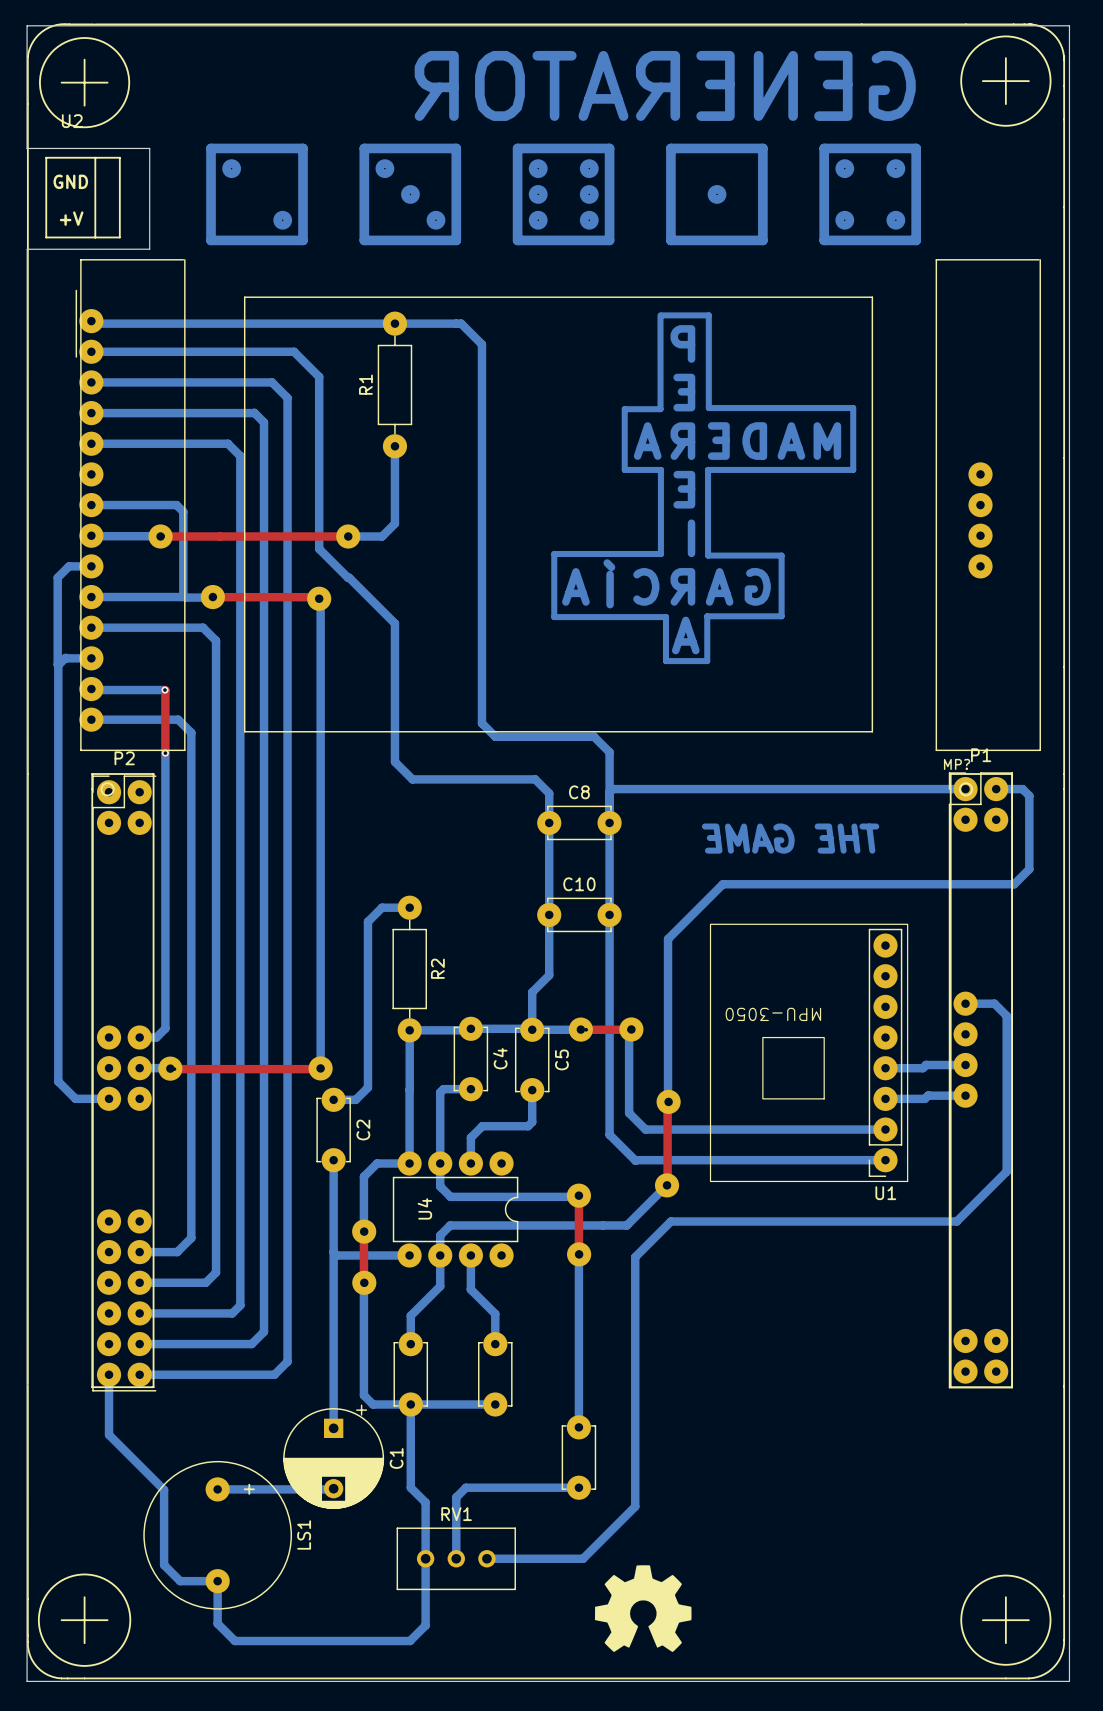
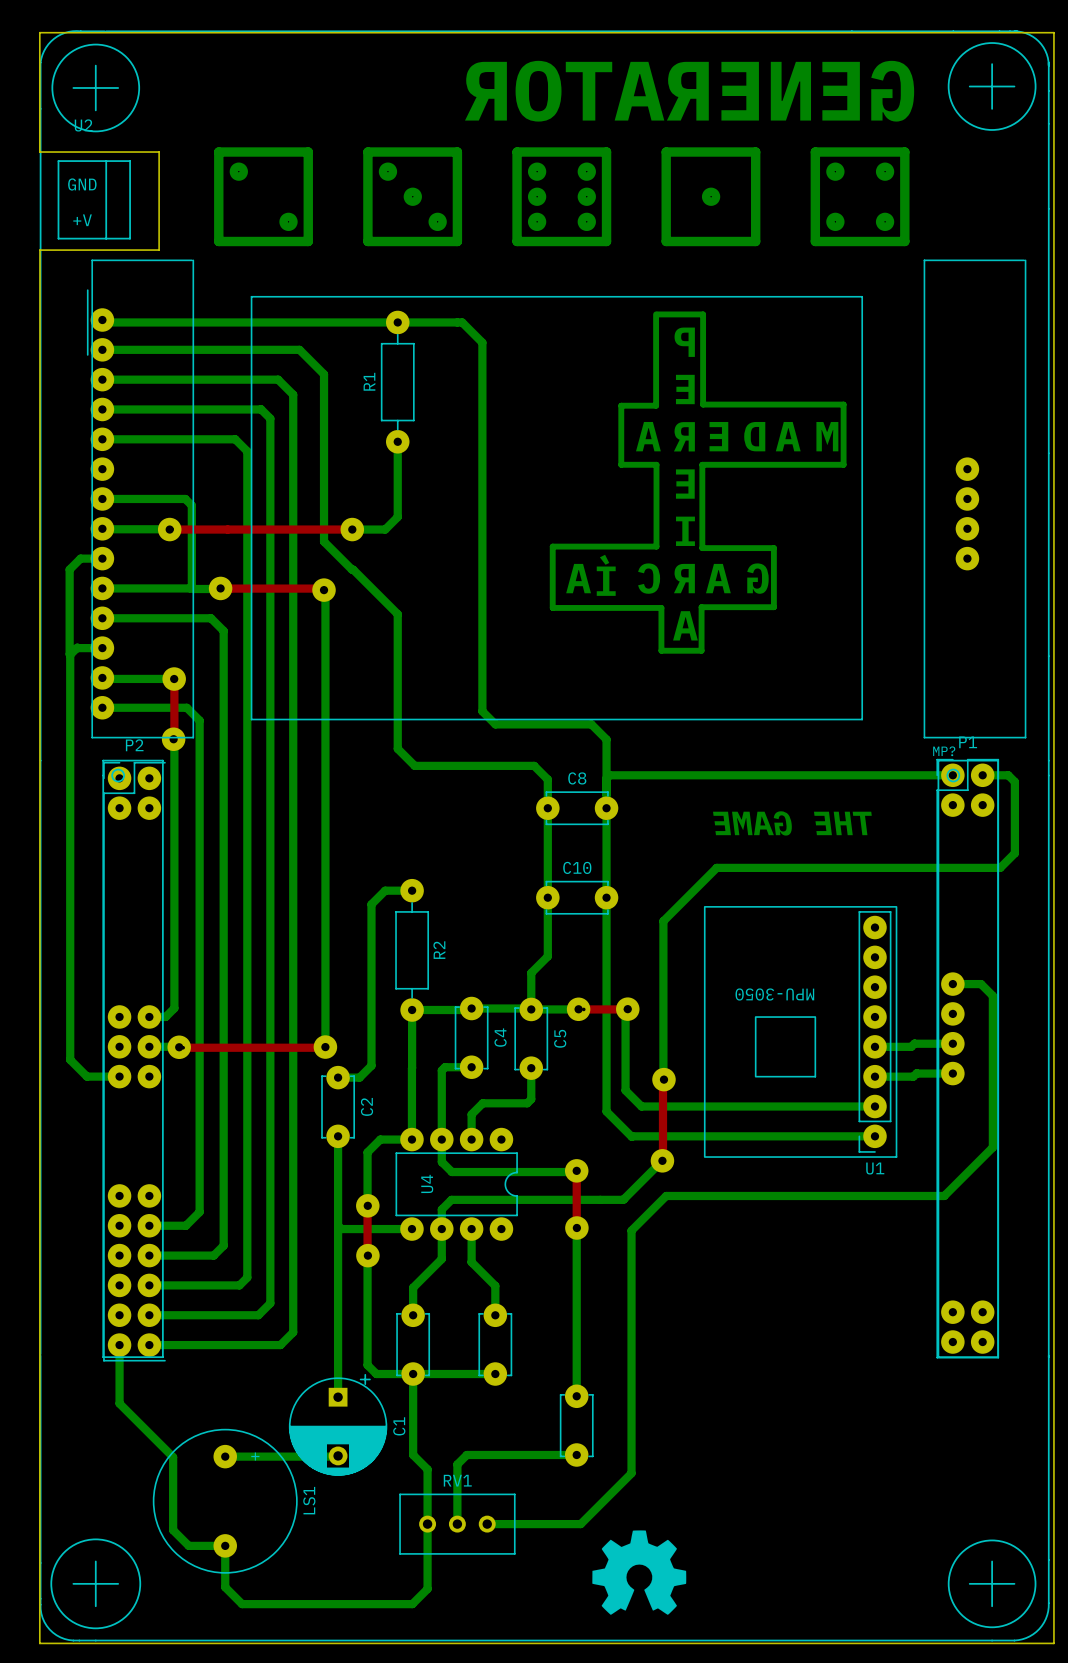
part: none -> (174, 679)
part: none -> (173, 739)

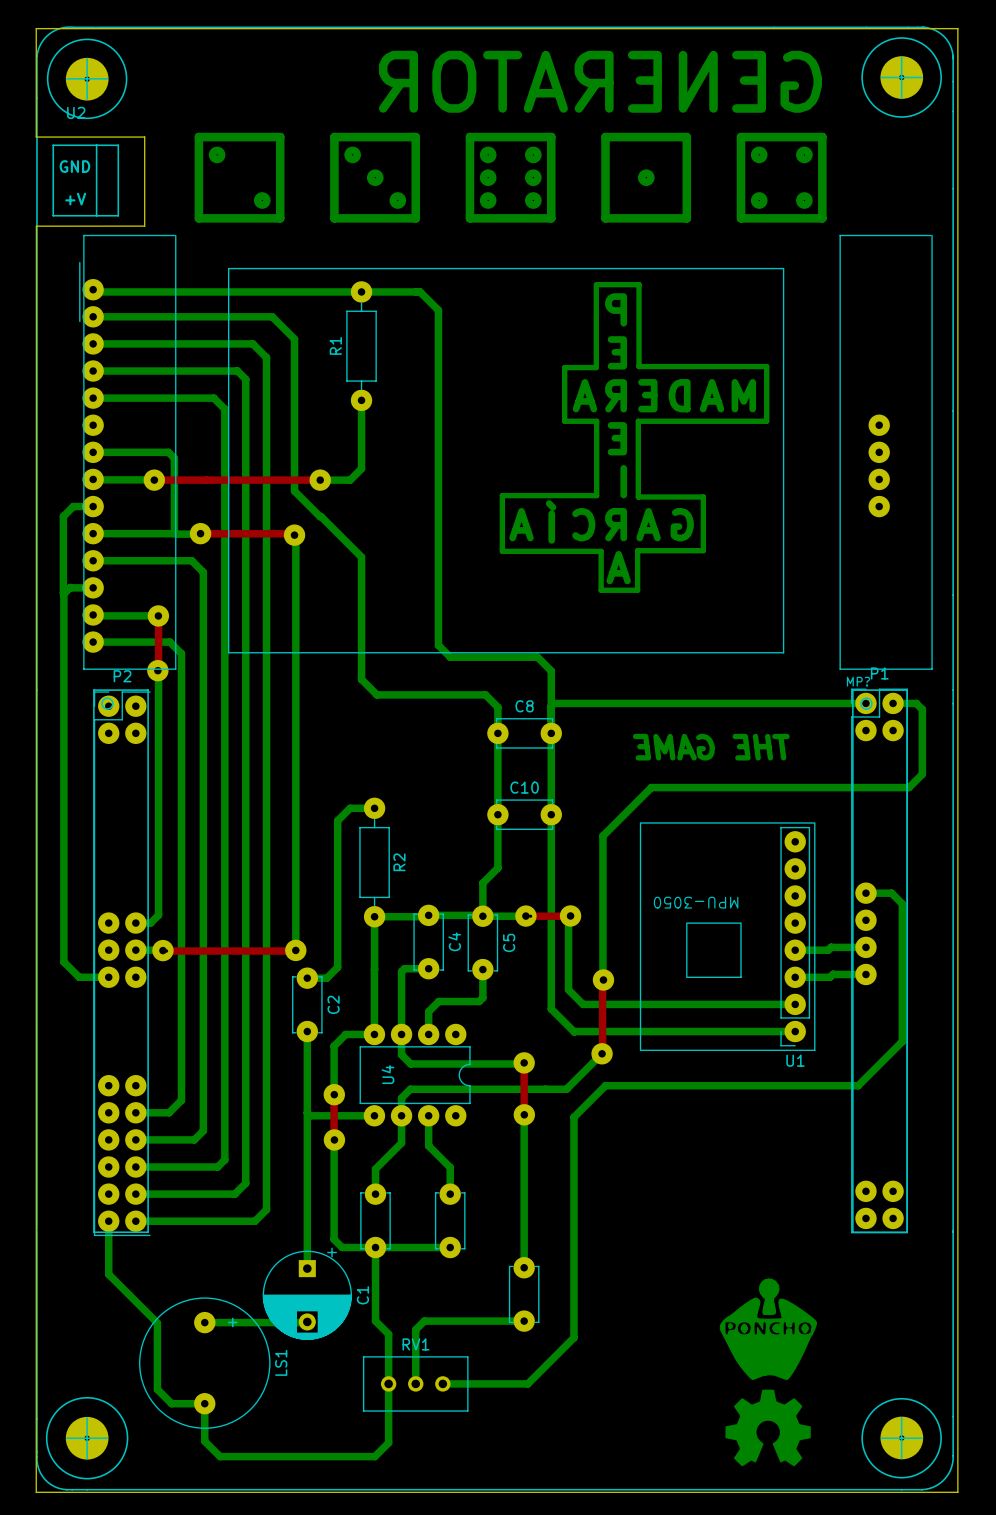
part: none -> (901, 77)
part: none -> (87, 79)
drawing: none -> [719, 1278, 818, 1467]
drawing: [592, 1530, 687, 1615] -> none
part: none -> (87, 1438)
part: none -> (901, 1437)

